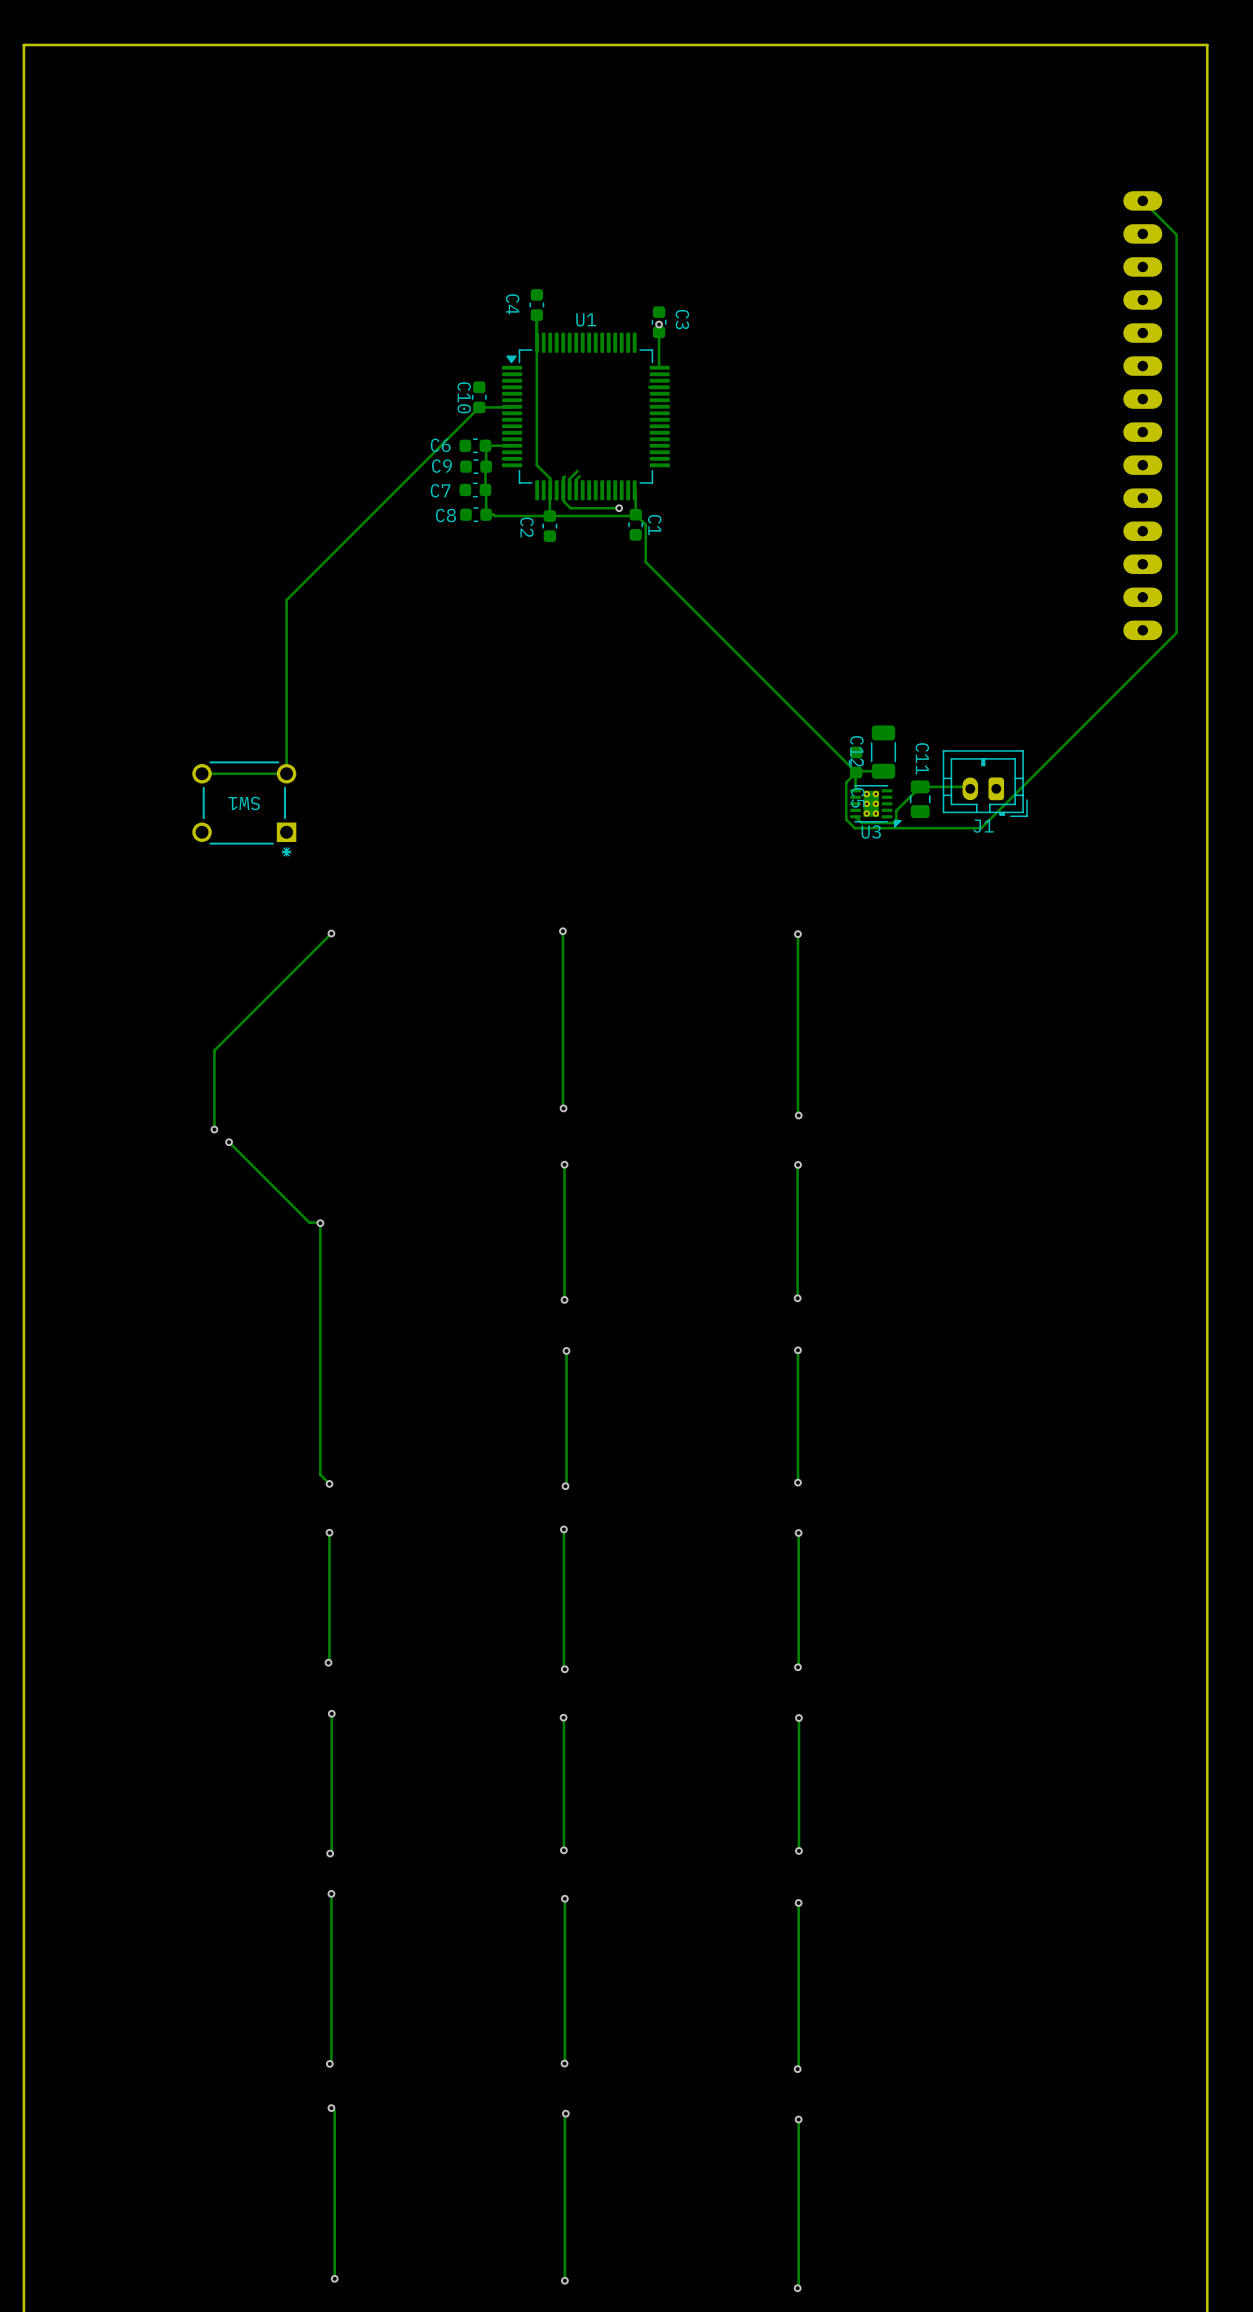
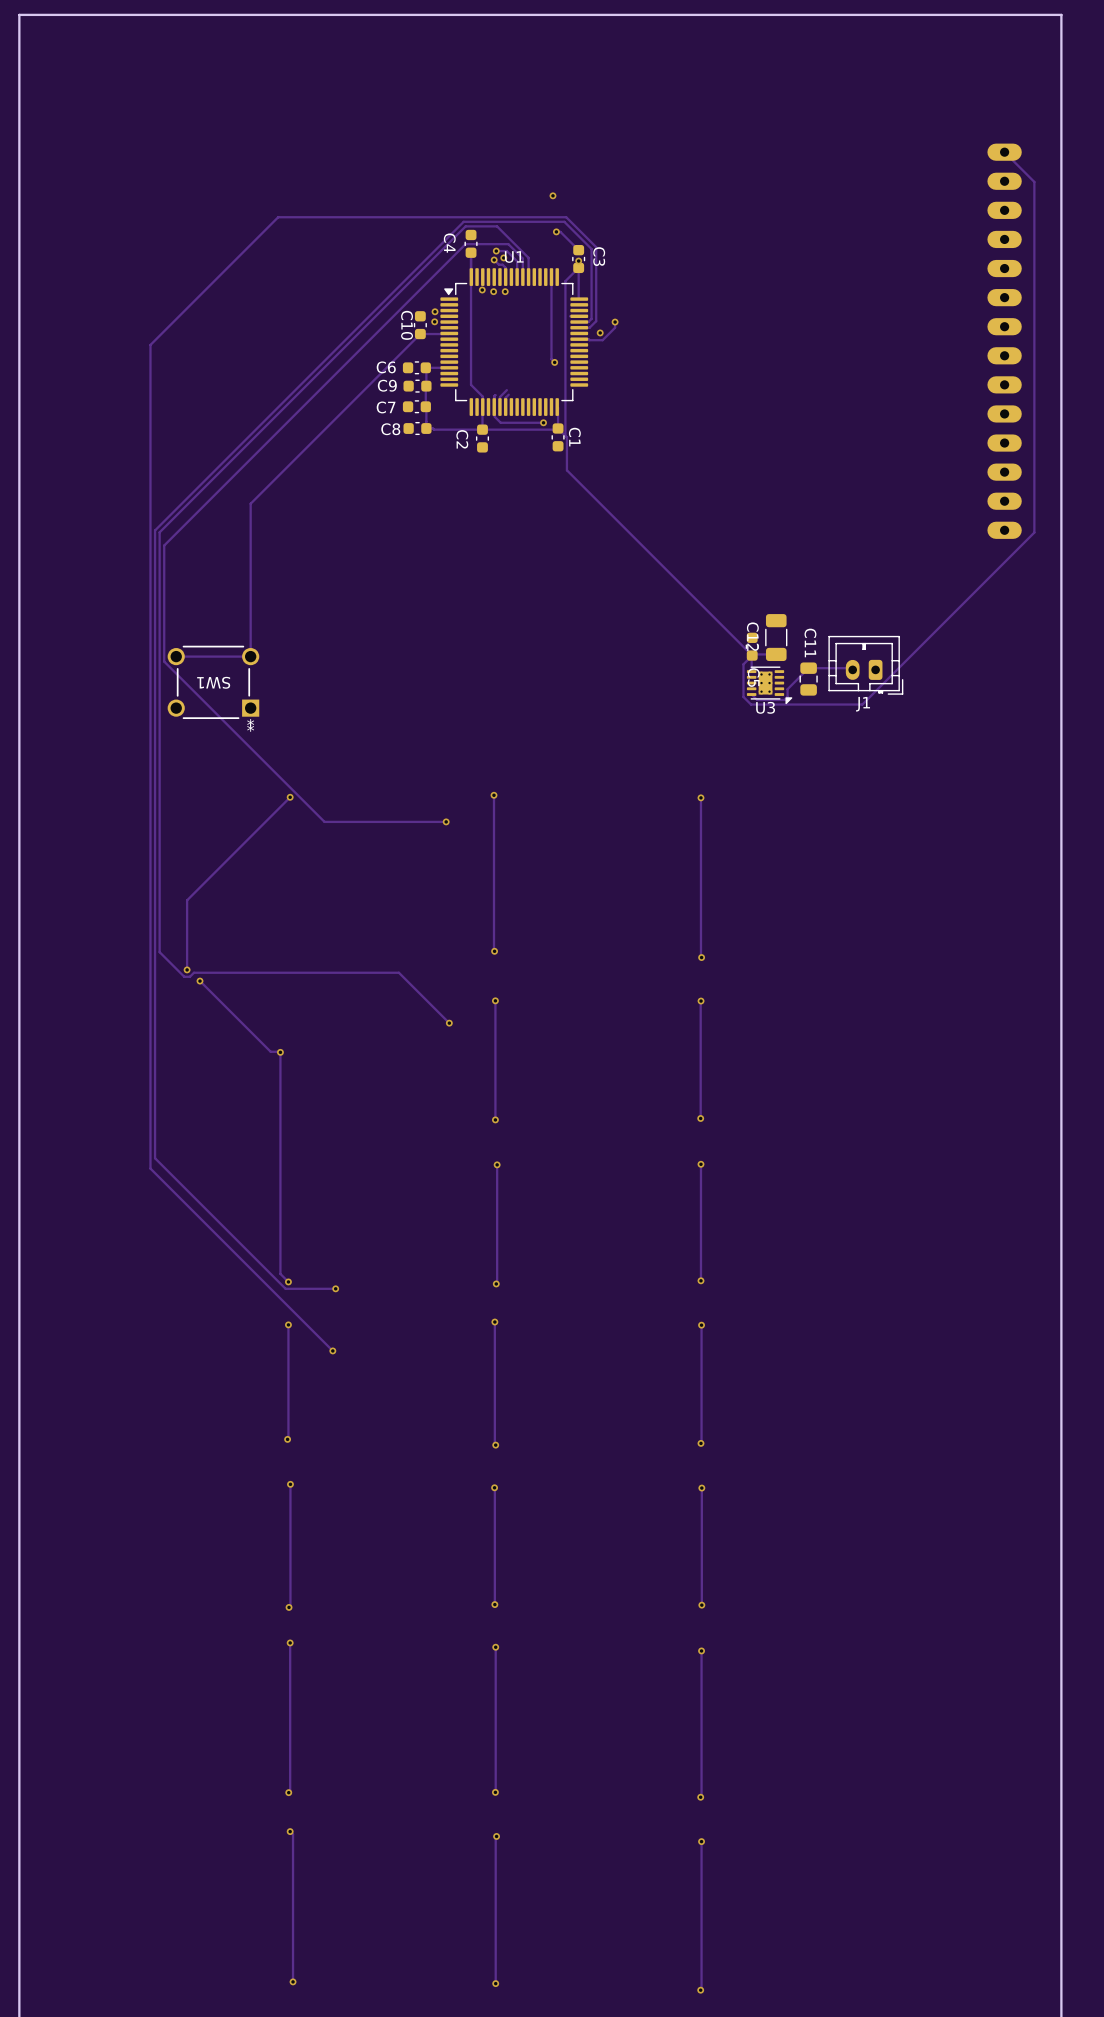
via: none -> (552, 195)
track: none -> (556, 231) (560, 231) (578, 250)
via: none -> (556, 231)
track: none -> (496, 251) (506, 251) (517, 261) (517, 277)
via: none -> (496, 251)
via: none -> (503, 257)
track: none -> (494, 259) (505, 267) (505, 277)
via: none -> (494, 259)
track: none -> (578, 267) (565, 281) (565, 435)
track: none -> (522, 277) (522, 258) (508, 244) (465, 244) (164, 545) (164, 661) (324, 821) (446, 821)
track: none -> (528, 277) (528, 257) (497, 226) (465, 226) (159, 532) (159, 952) (184, 976) (189, 976) (193, 972) (398, 972) (449, 1023)
track: none -> (551, 277) (551, 359) (554, 362)
via: none -> (482, 290)
via: none -> (493, 291)
via: none -> (505, 291)
via: none -> (435, 311)
via: none -> (434, 321)
track: none -> (579, 322) (588, 322) (591, 318) (591, 249) (564, 221) (463, 221) (155, 530) (155, 1158) (285, 1288) (337, 1288)
track: none -> (615, 322) (615, 327) (602, 340) (579, 339)
via: none -> (615, 322)
track: none -> (579, 327) (589, 327) (596, 321) (596, 247) (566, 217) (278, 217) (150, 344) (150, 1168) (332, 1350)
via: none -> (600, 332)
via: none -> (554, 362)
via: none -> (446, 821)
via: none -> (449, 1023)
via: none -> (335, 1288)
via: none -> (332, 1350)

